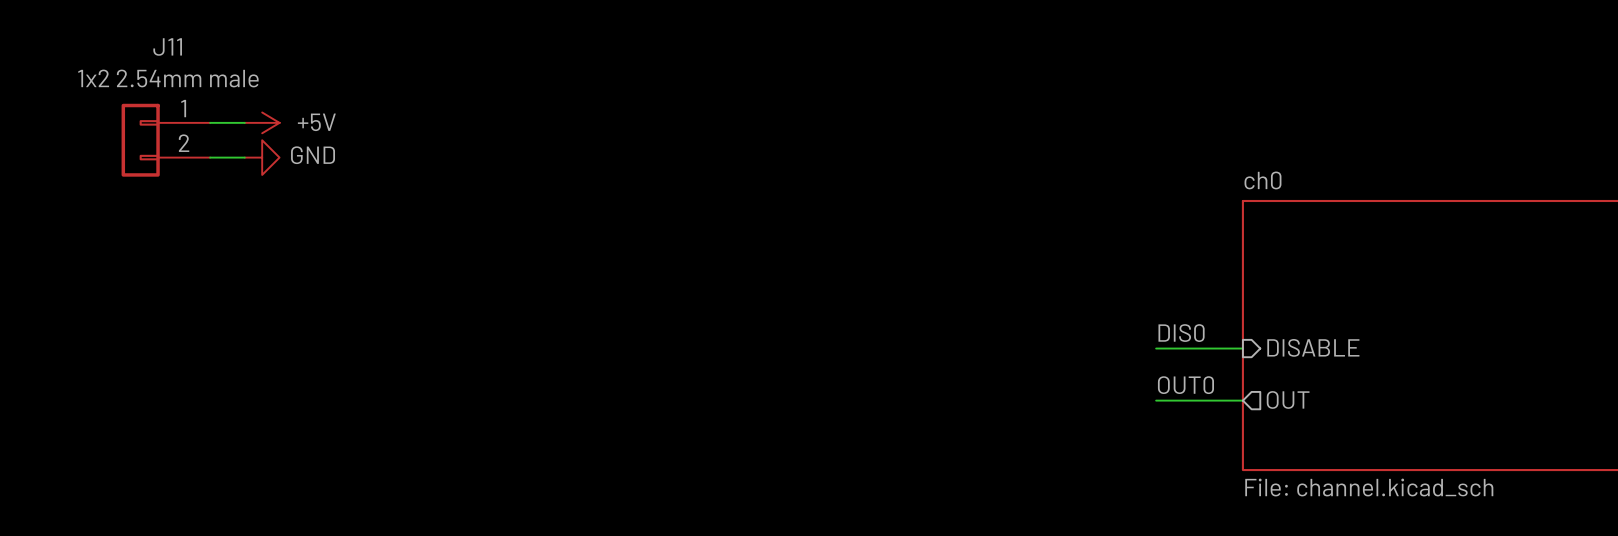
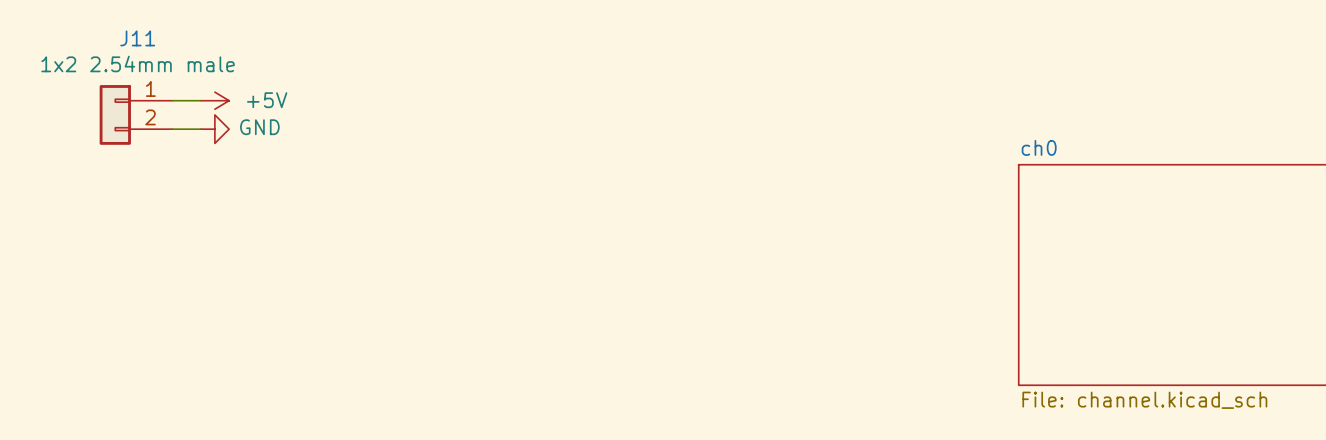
label: DIS0 (1181, 333) -> none
sheet pin: DISABLE (1313, 347) -> none
wire: (1156, 348) (1242, 348) -> none
label: OUT0 (1185, 385) -> none
sheet pin: OUT (1288, 399) -> none
wire: (1156, 400) (1242, 400) -> none

